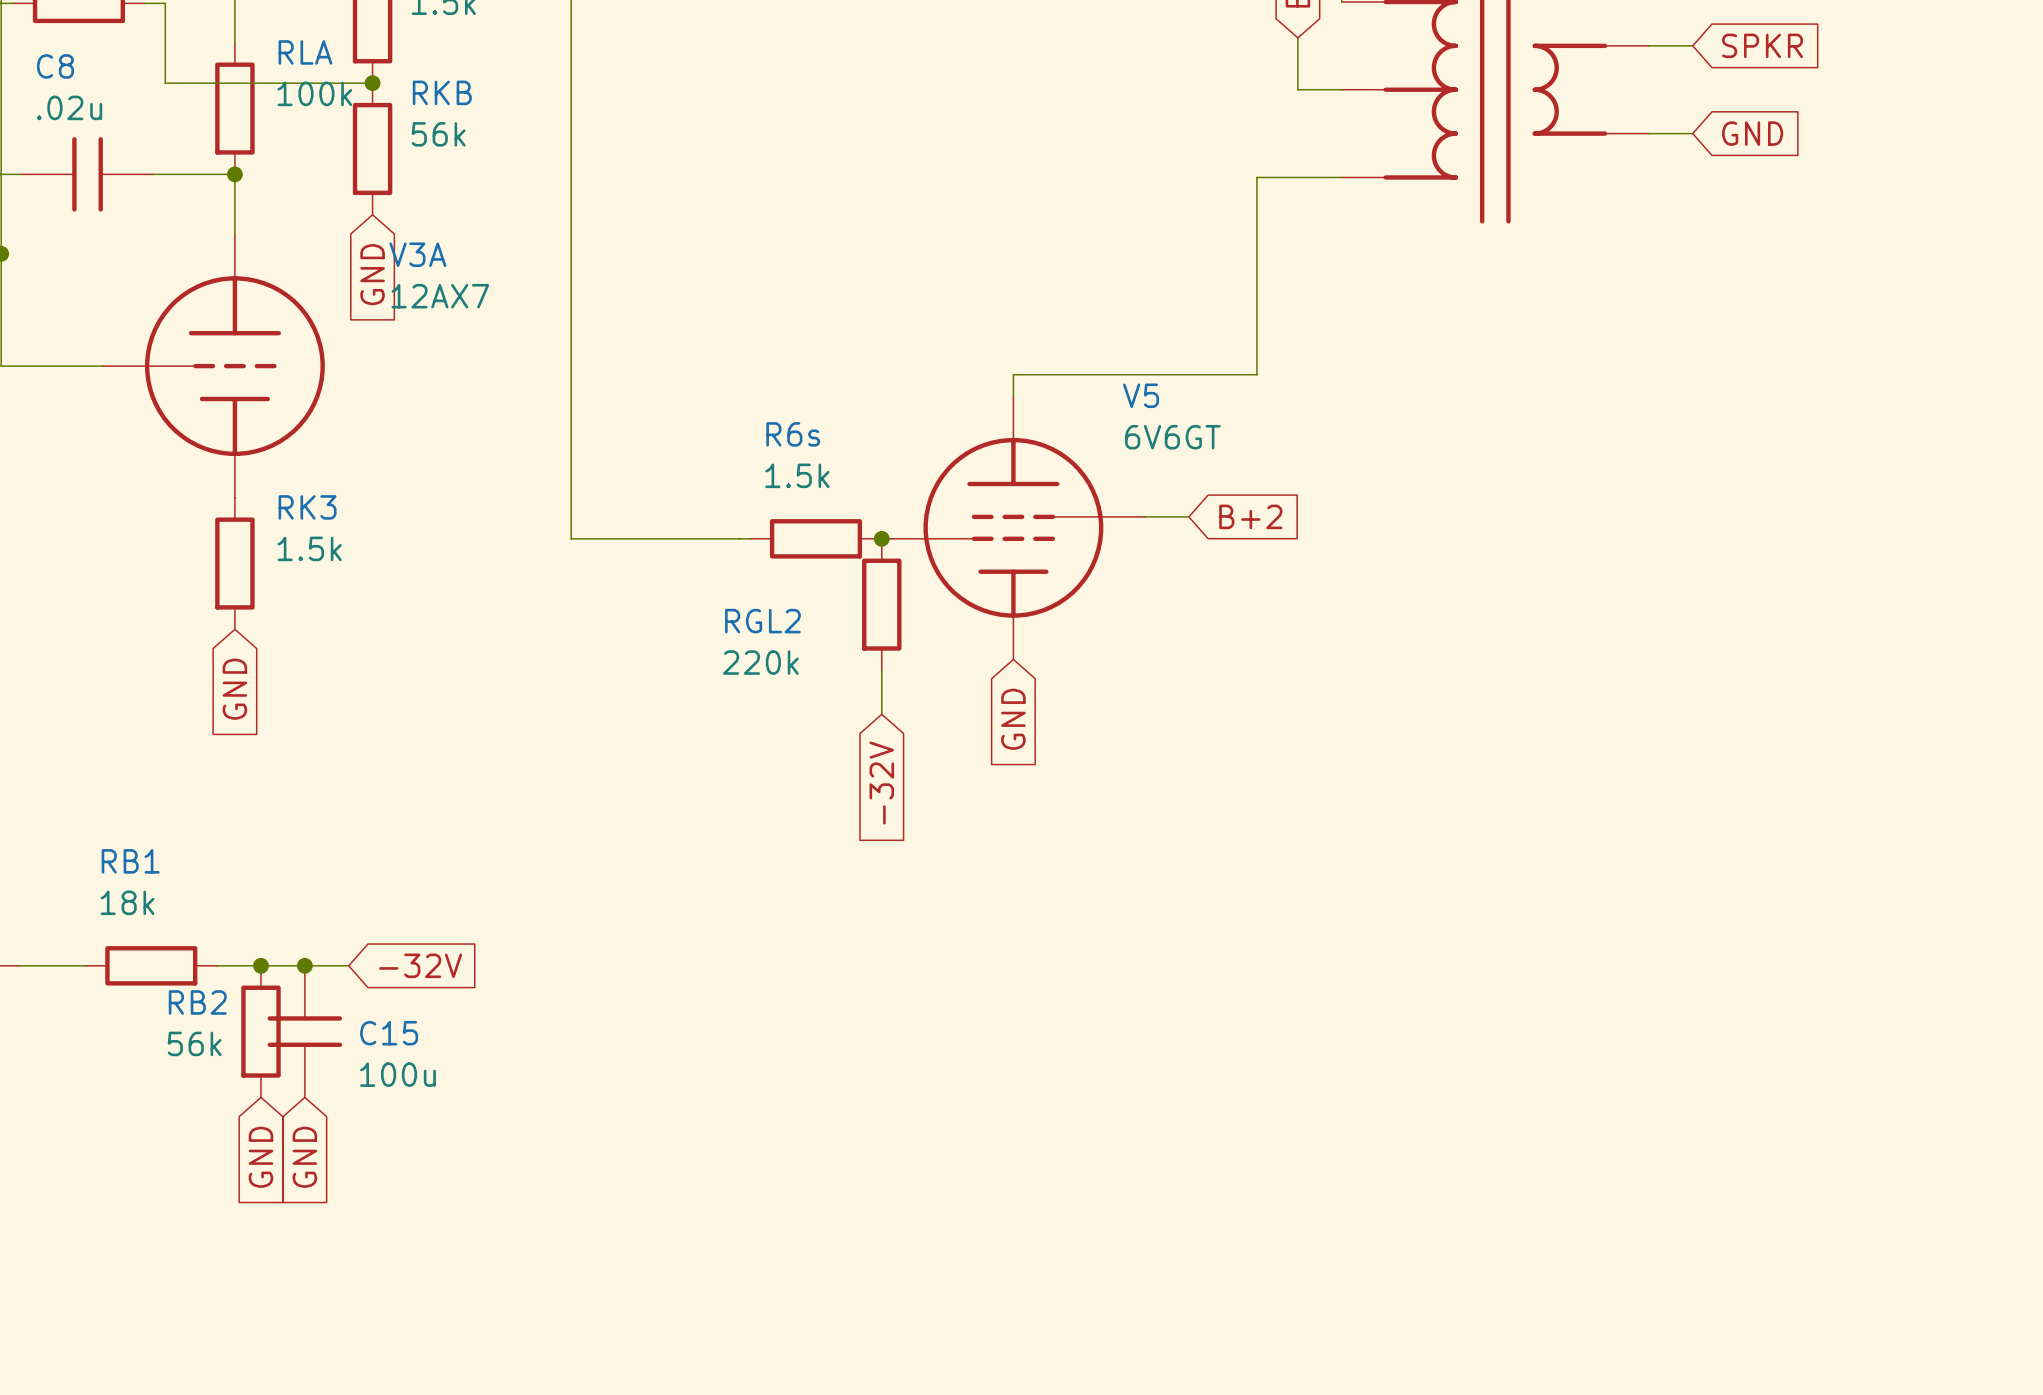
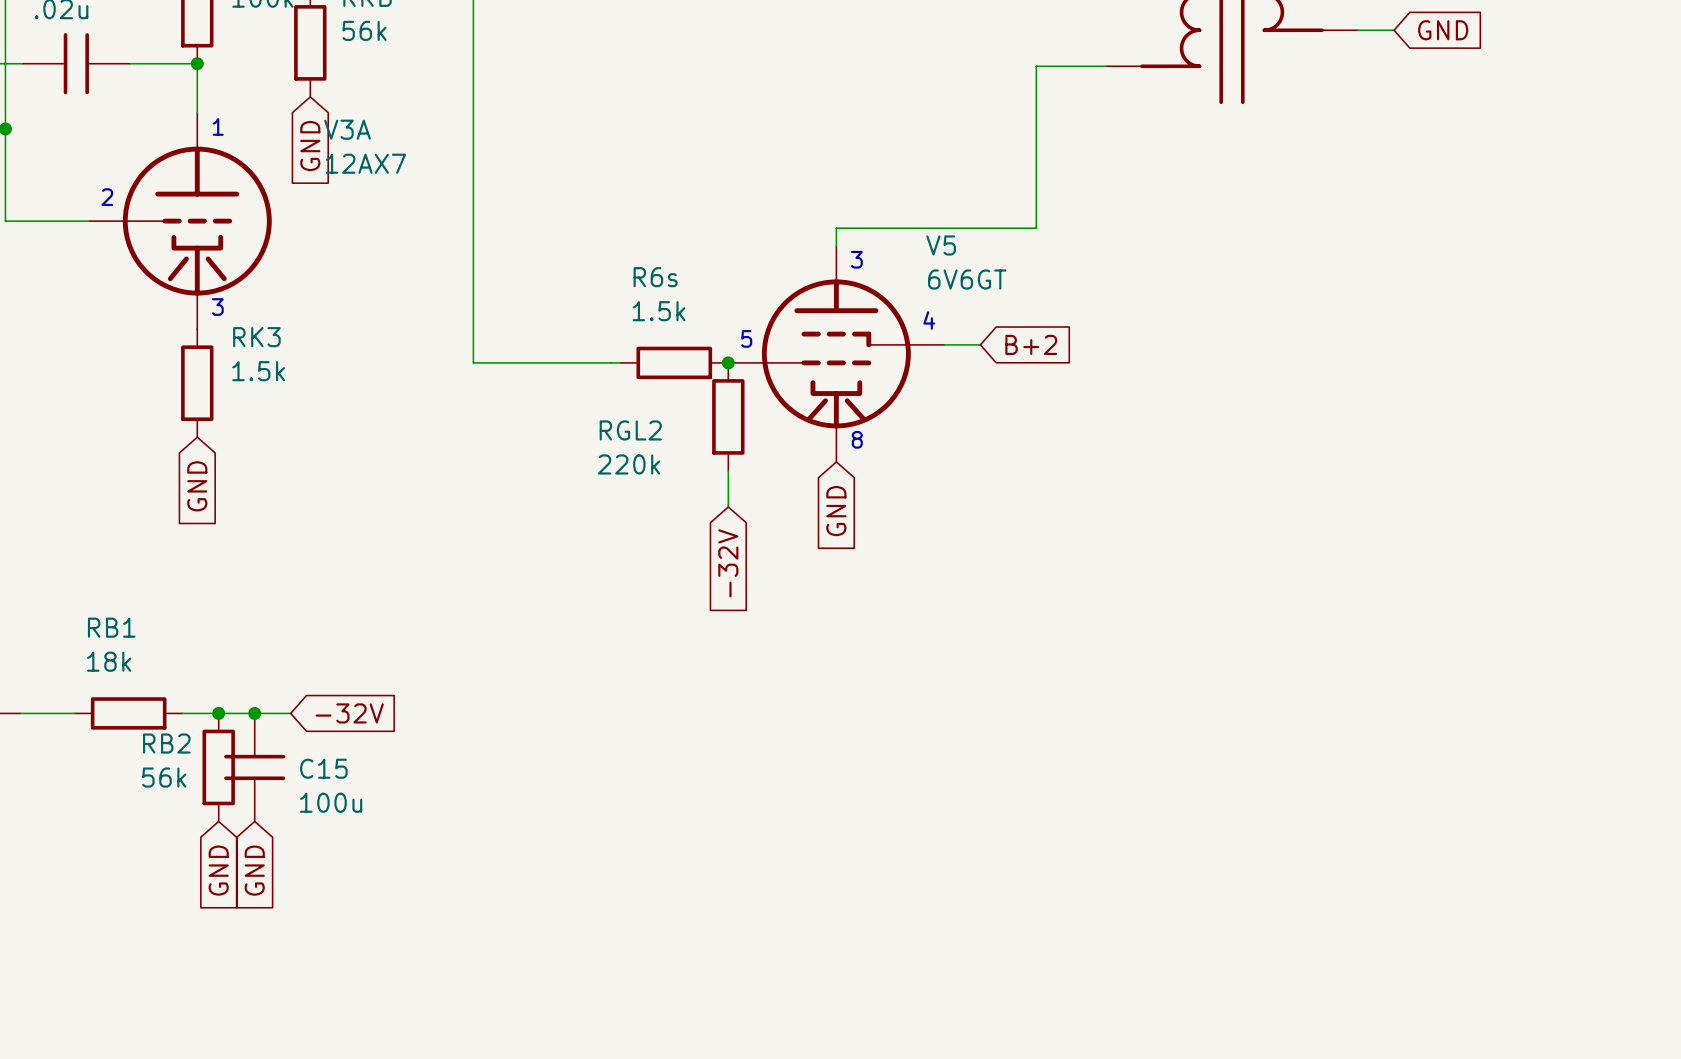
V3A symbol: [103, 234, 325, 498] -> [89, 113, 272, 330]
text: none -> 1 (218, 126)
text: none -> 2 (107, 197)
V5 symbol: [881, 396, 1146, 660] -> [728, 245, 945, 462]
text: none -> 3 (856, 259)
text: none -> 3 (217, 307)
text: none -> 4 (929, 320)
text: none -> 5 (746, 338)
text: none -> 8 (857, 439)

